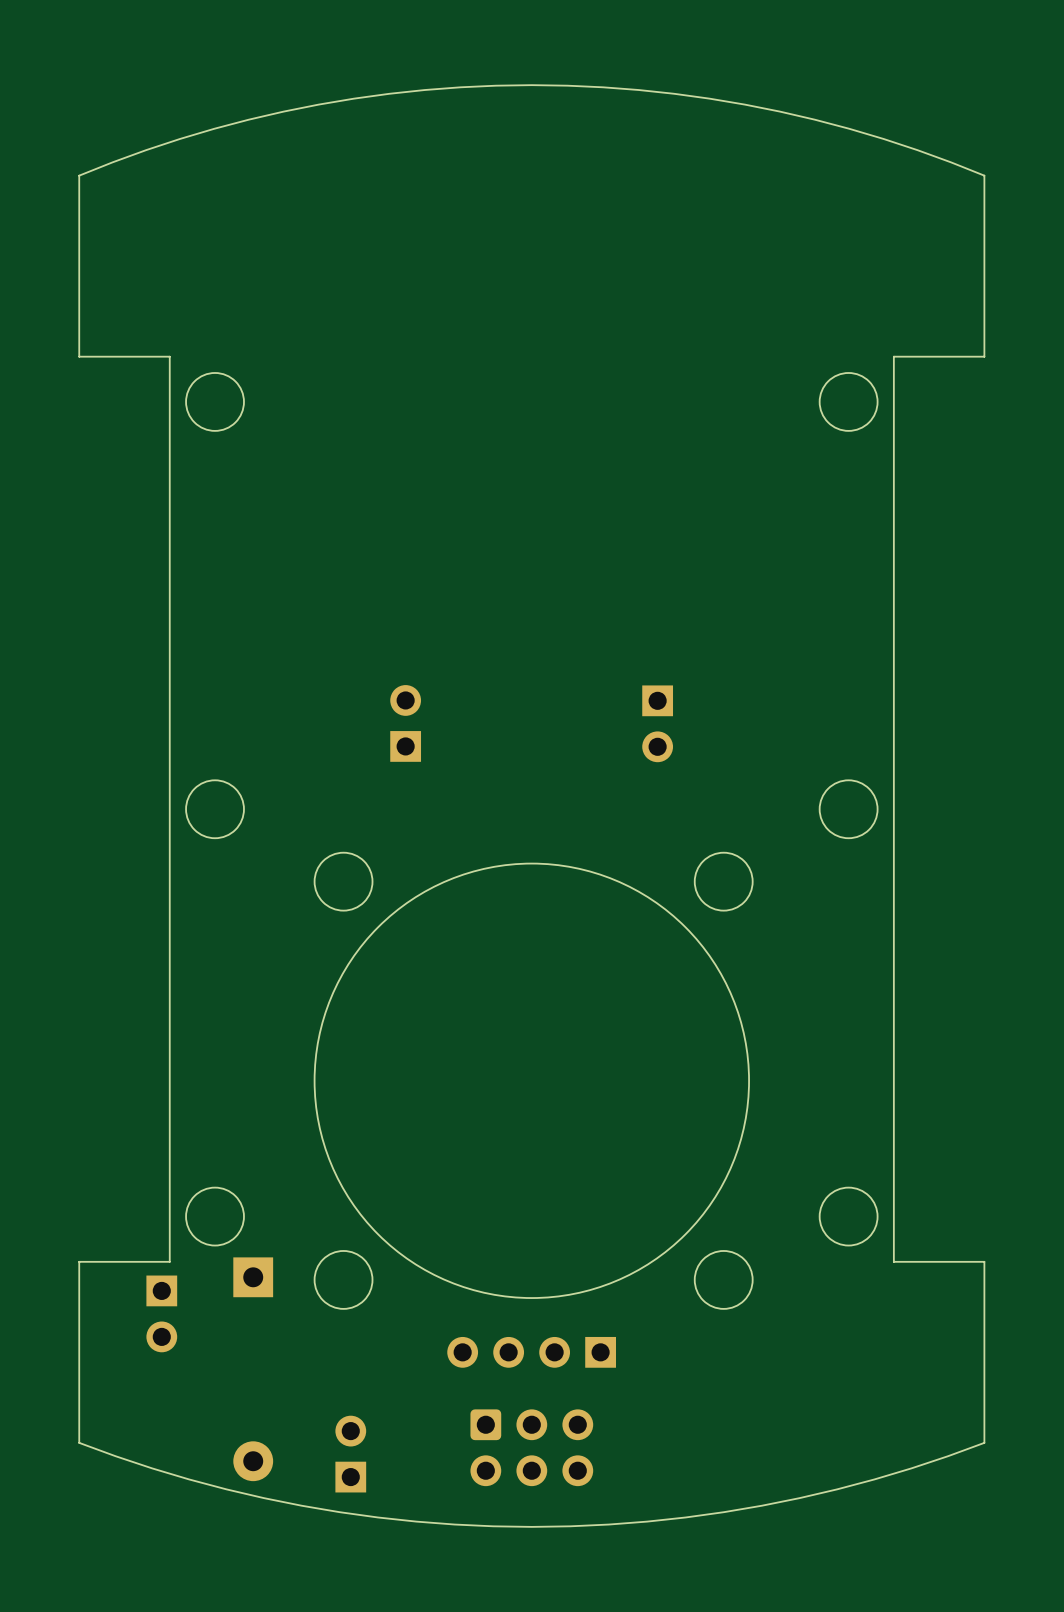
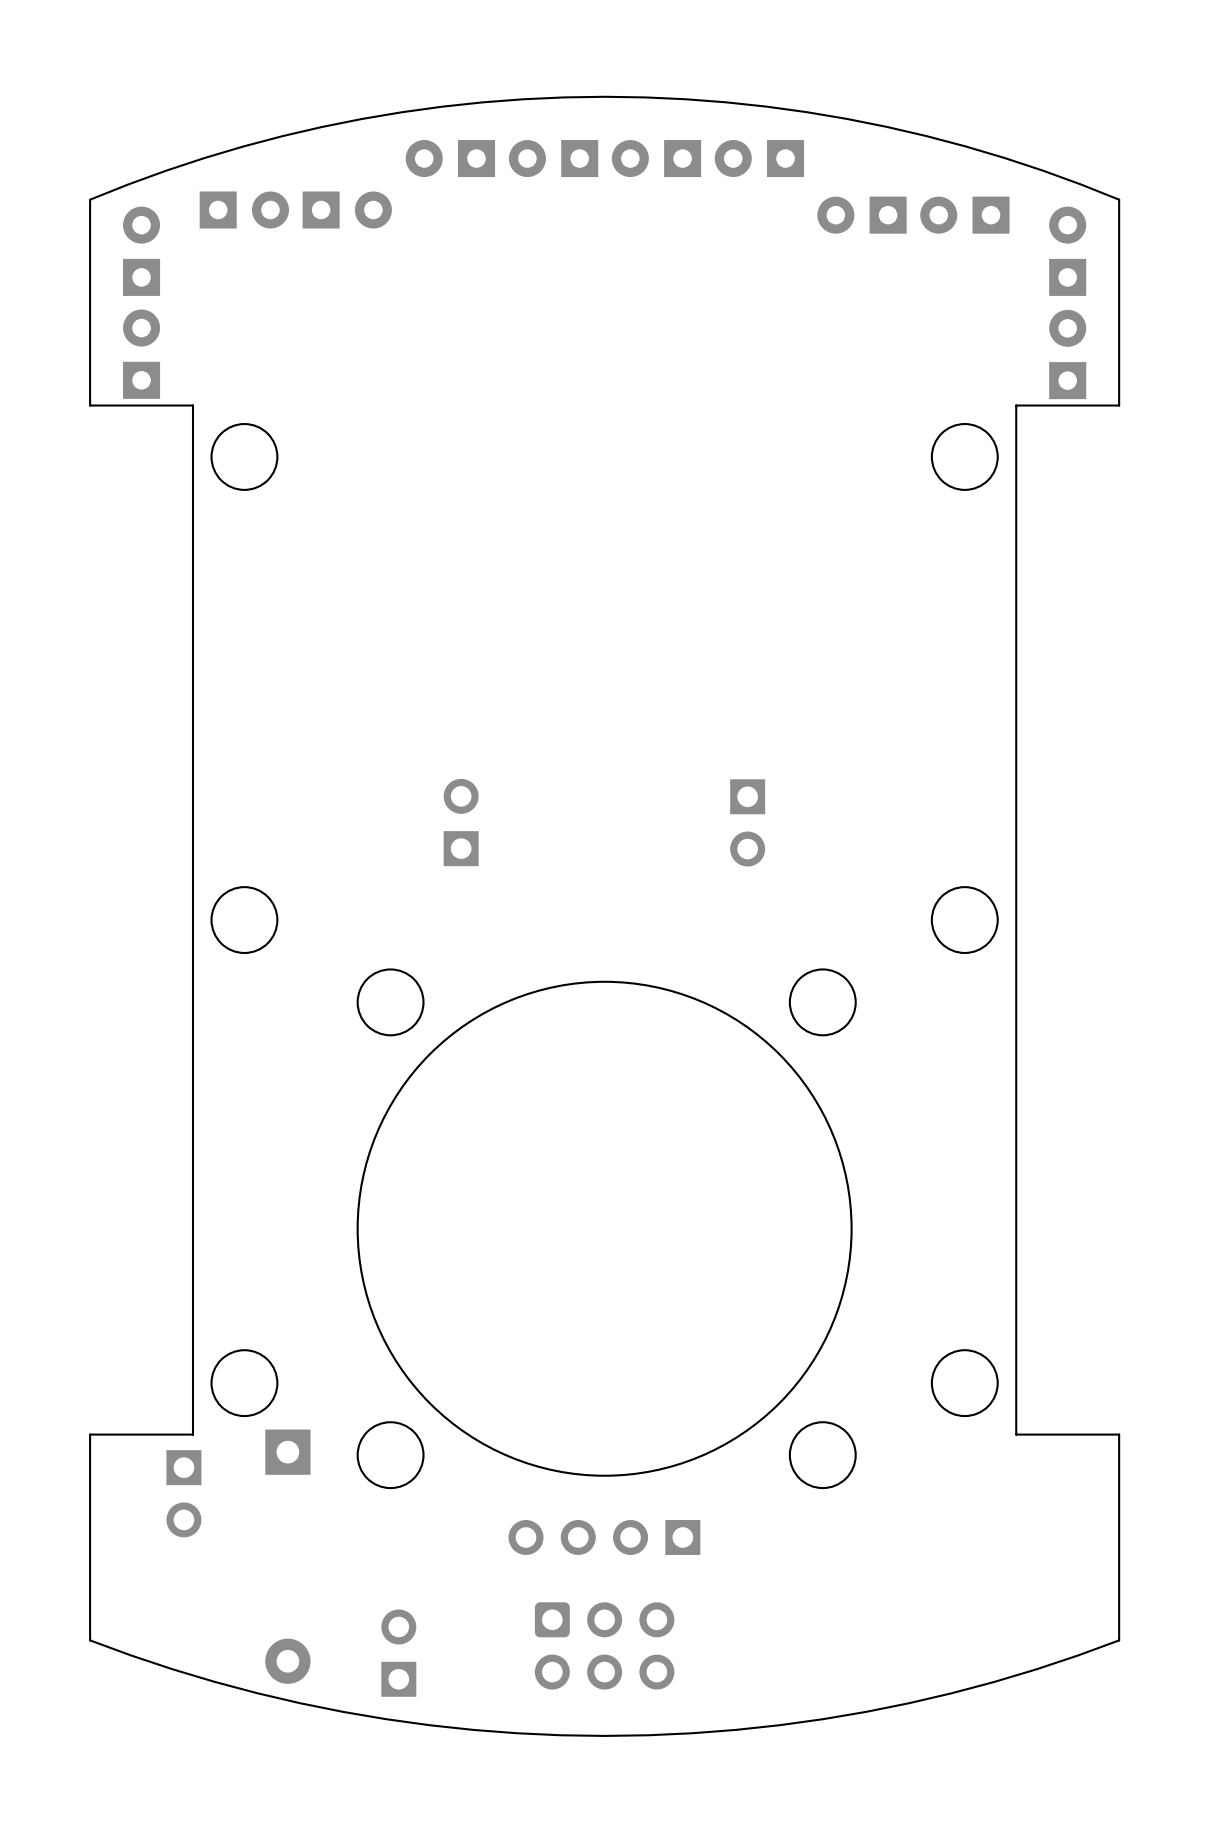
part: none -> (450, 158)
part: none -> (553, 158)
part: none -> (656, 158)
part: none -> (759, 158)
part: none -> (244, 209)
part: none -> (347, 209)
part: none -> (861, 215)
part: none -> (964, 215)
part: none -> (141, 251)
part: none -> (1067, 251)
part: none -> (141, 354)
part: none -> (1067, 354)

